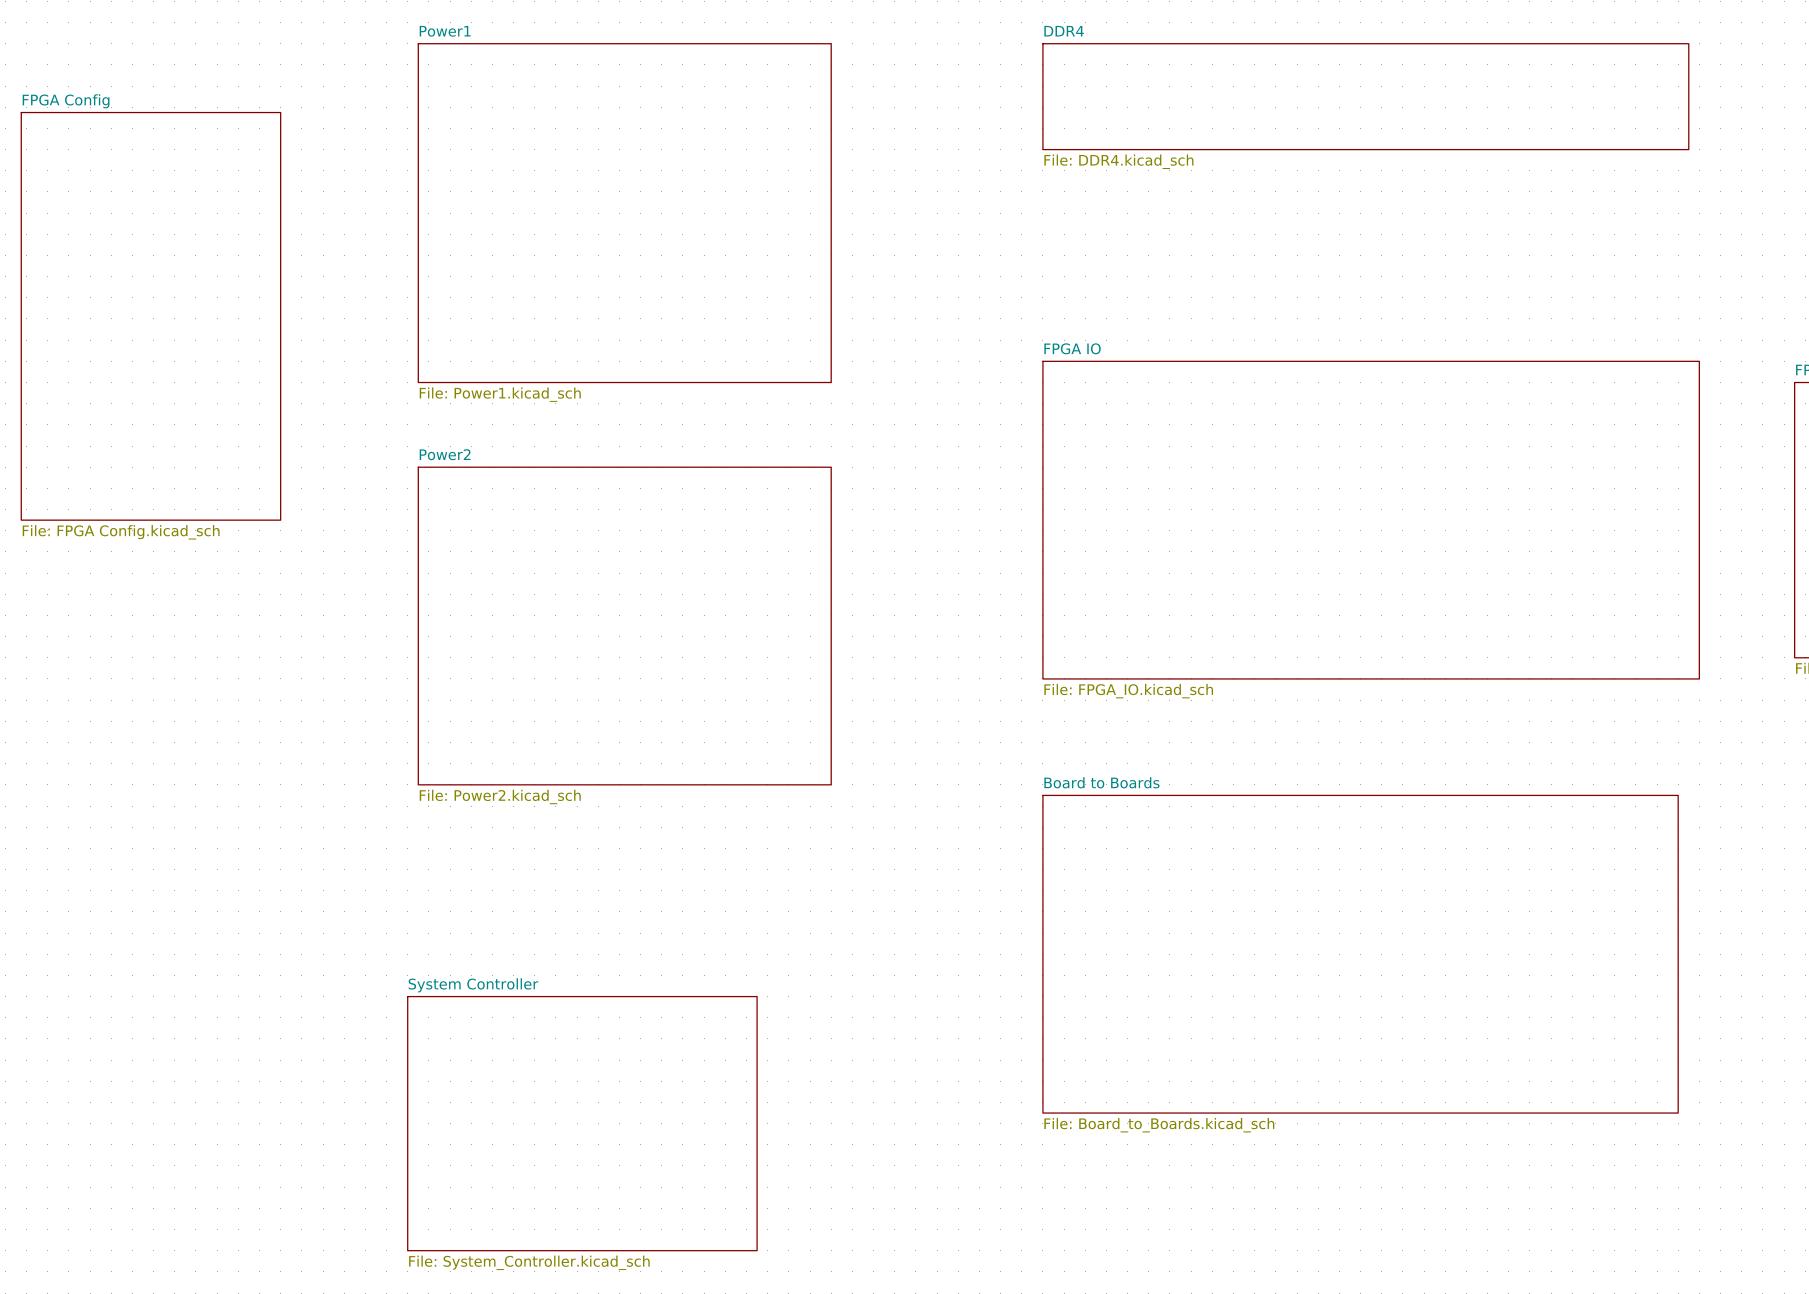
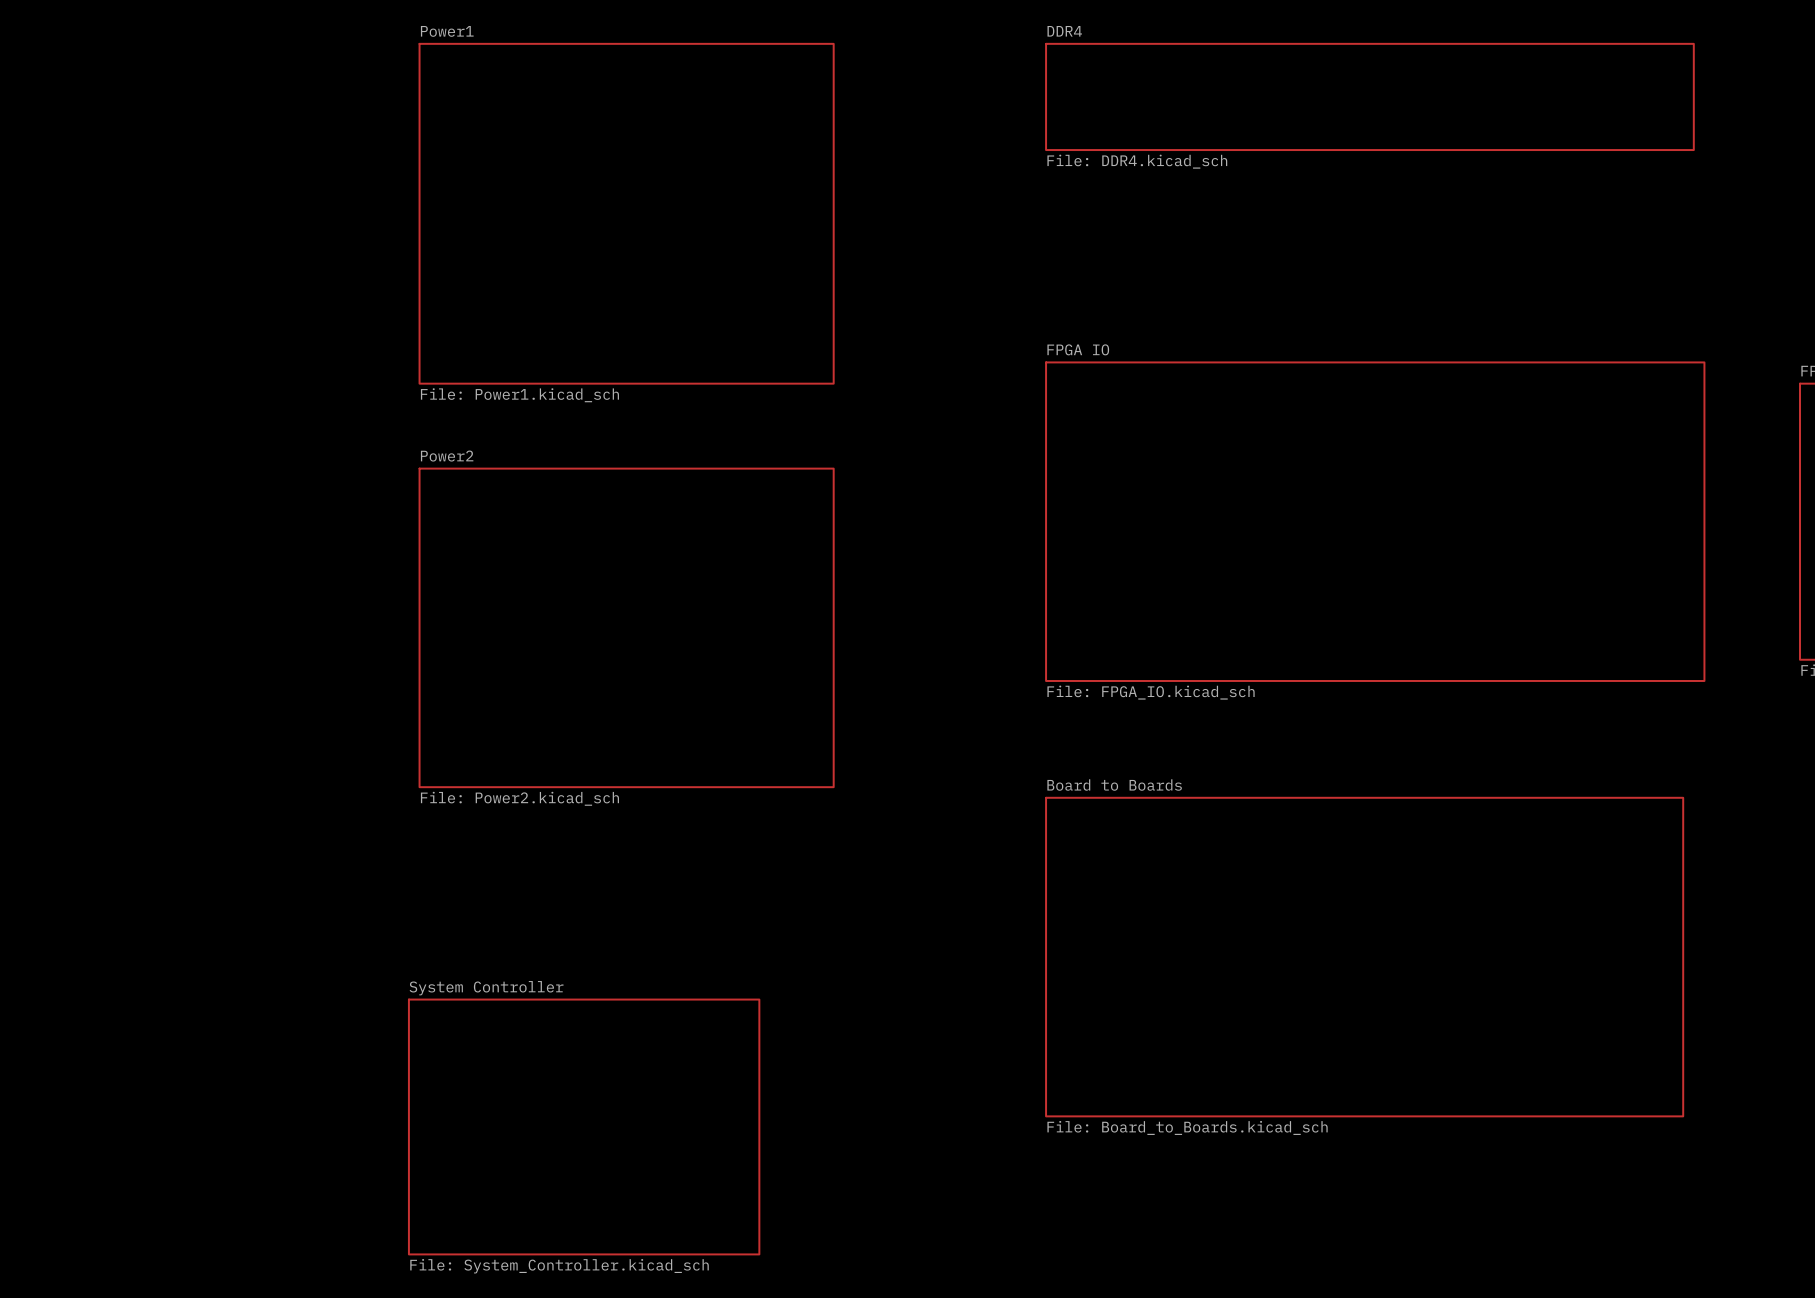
sheet FPGA Config: File: FPGA Config.kicad_sch (150, 316) -> none

